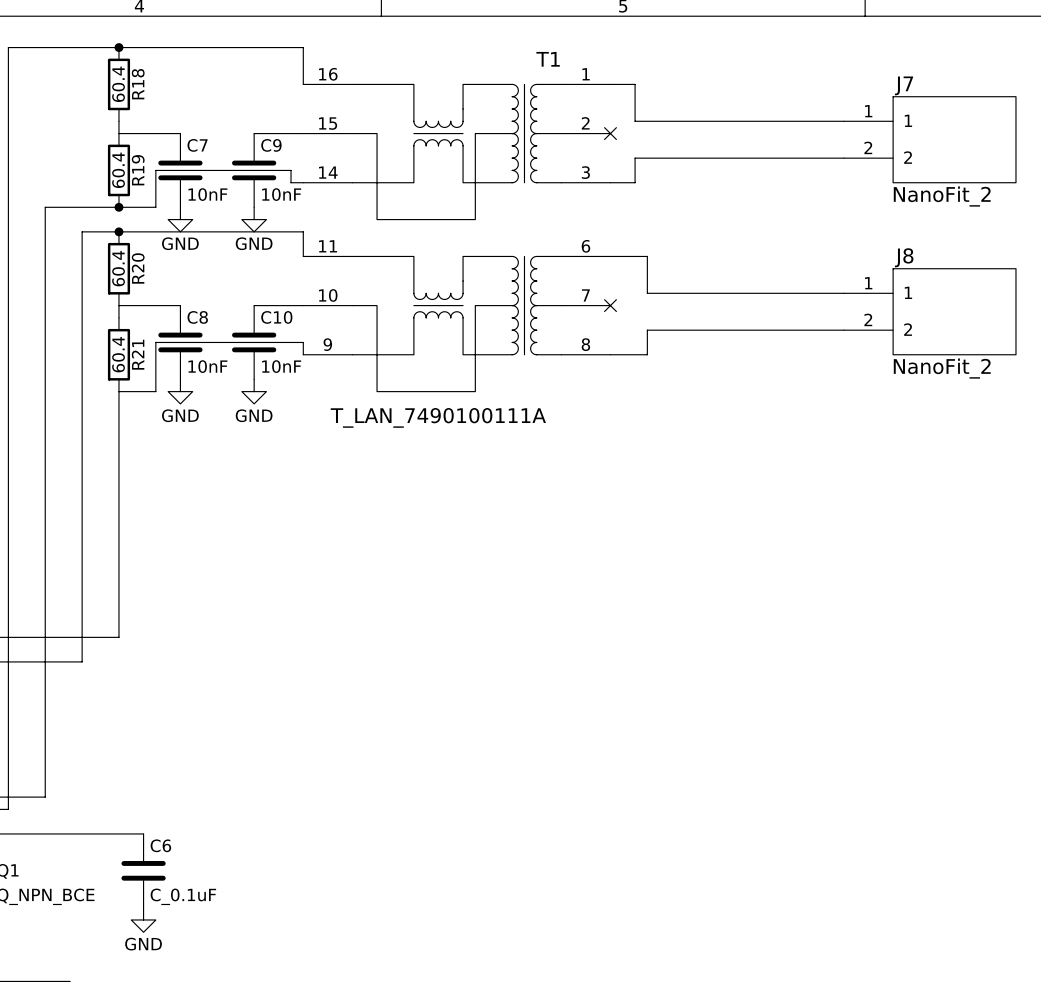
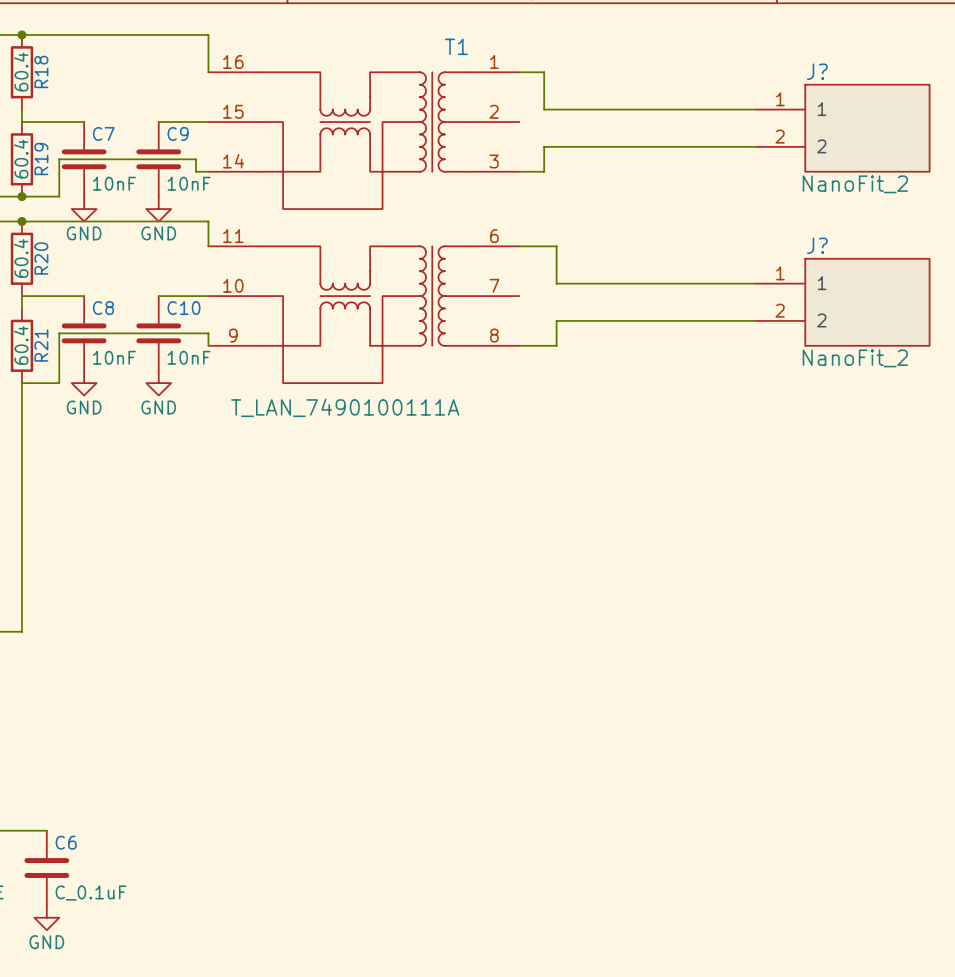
J7 name: J7 (904, 85) -> J? (817, 71)
no-connect mark: (610, 133) -> none
J8 name: J8 (904, 257) -> J? (817, 245)
no-connect mark: (610, 305) -> none

